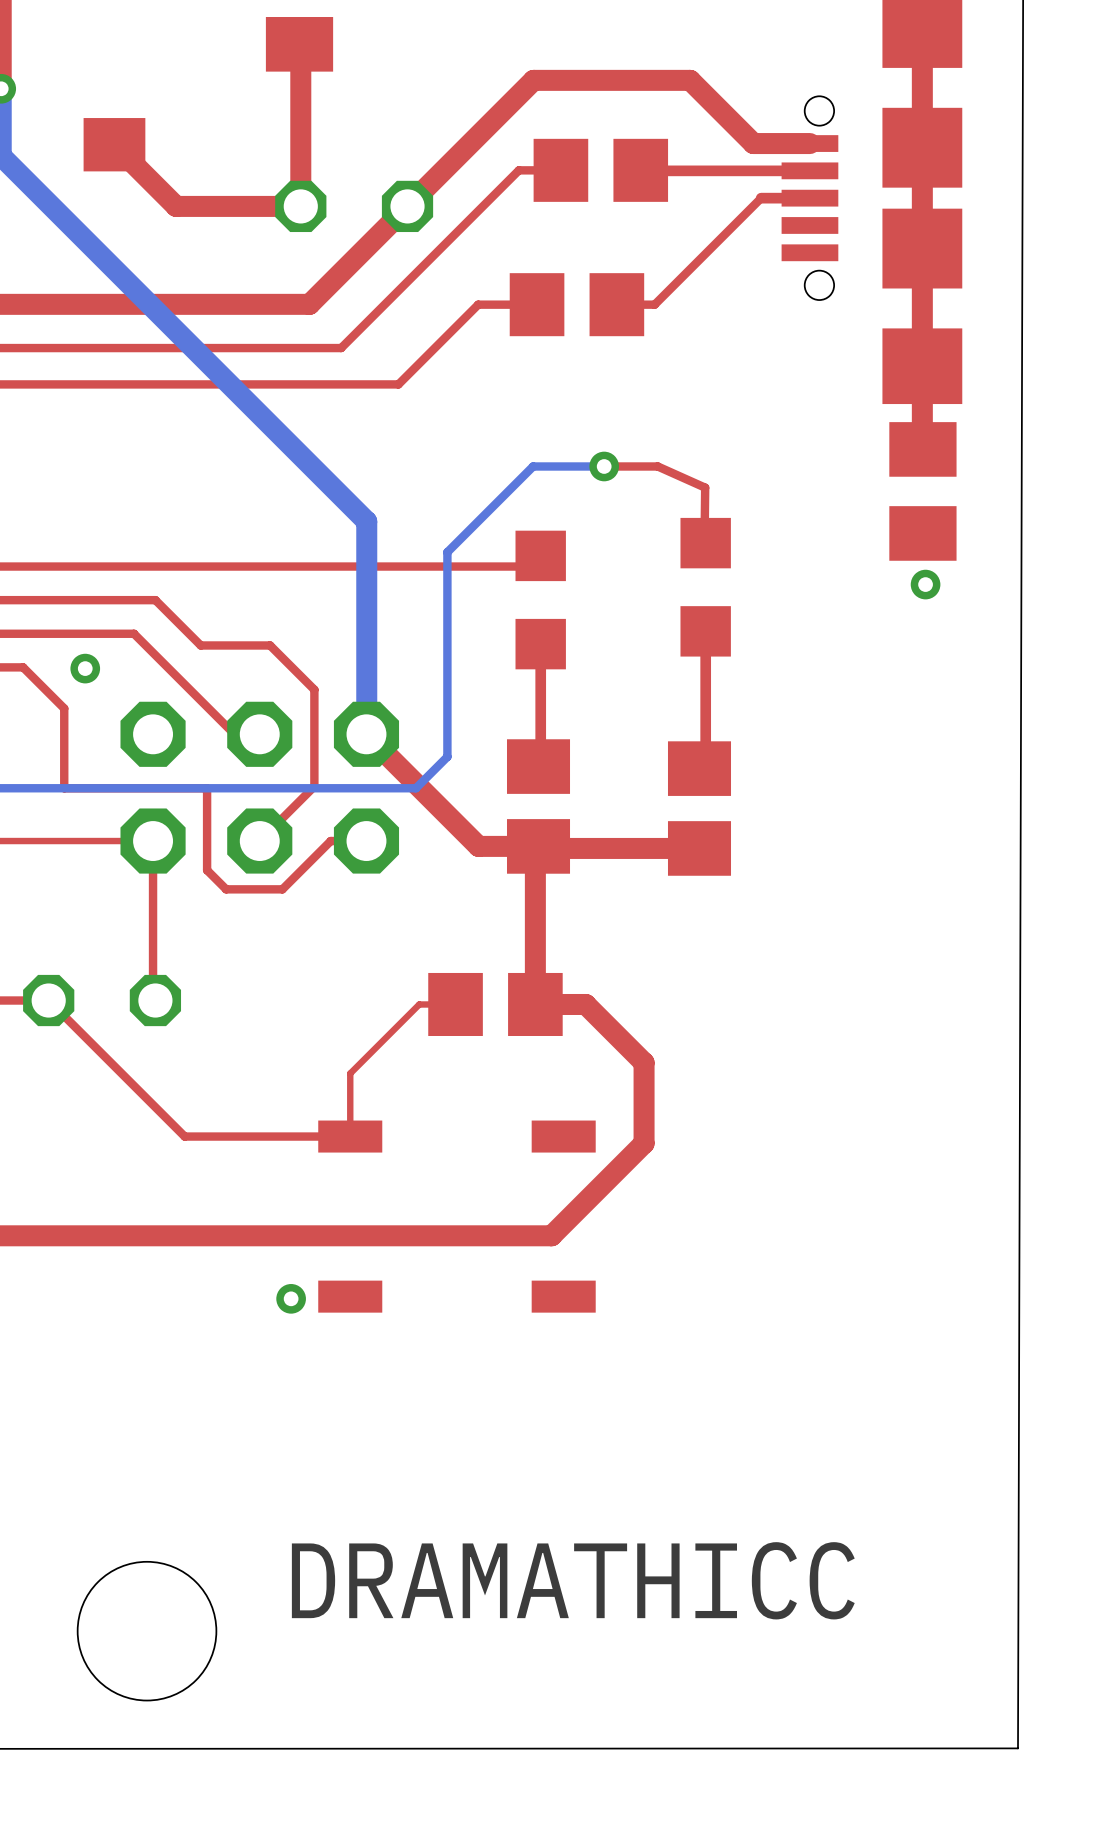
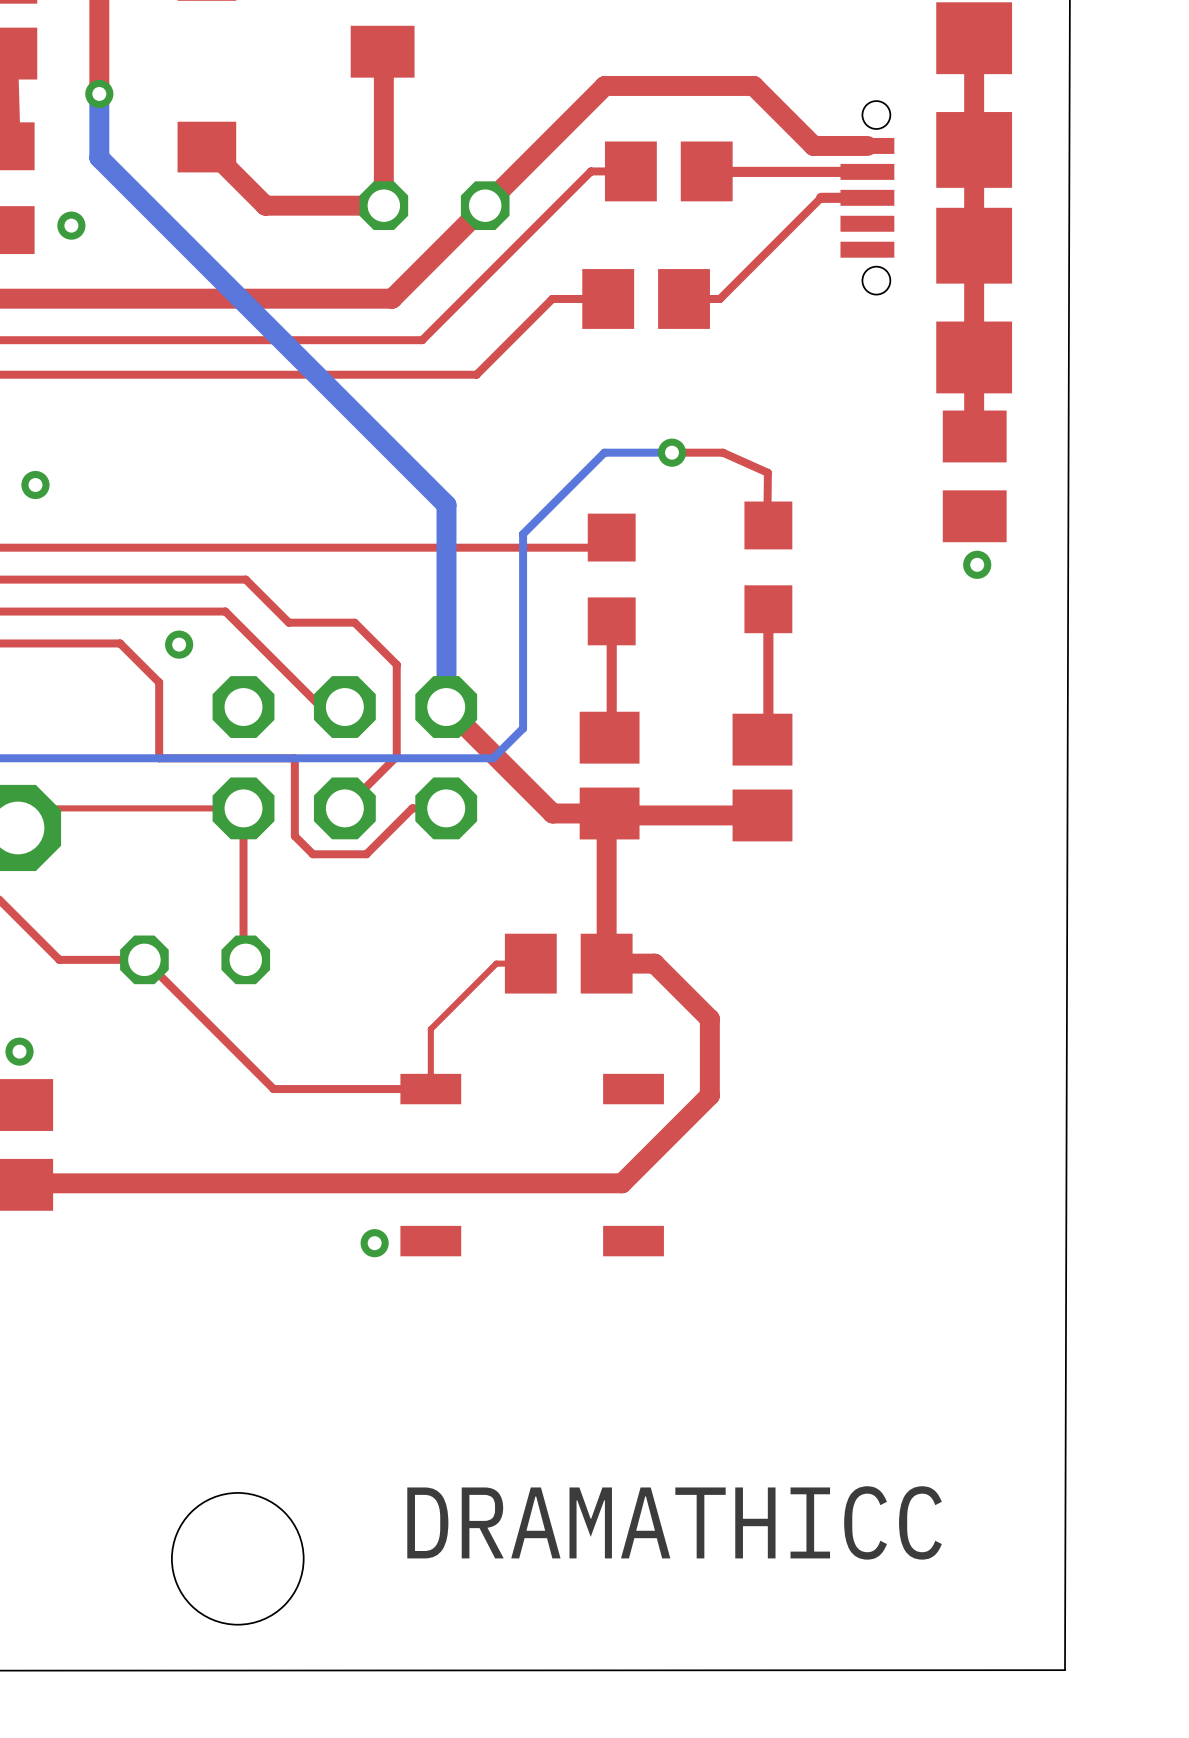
text position: DRAMATHICC (573, 1580) -> DRAMATHICC (674, 1522)

